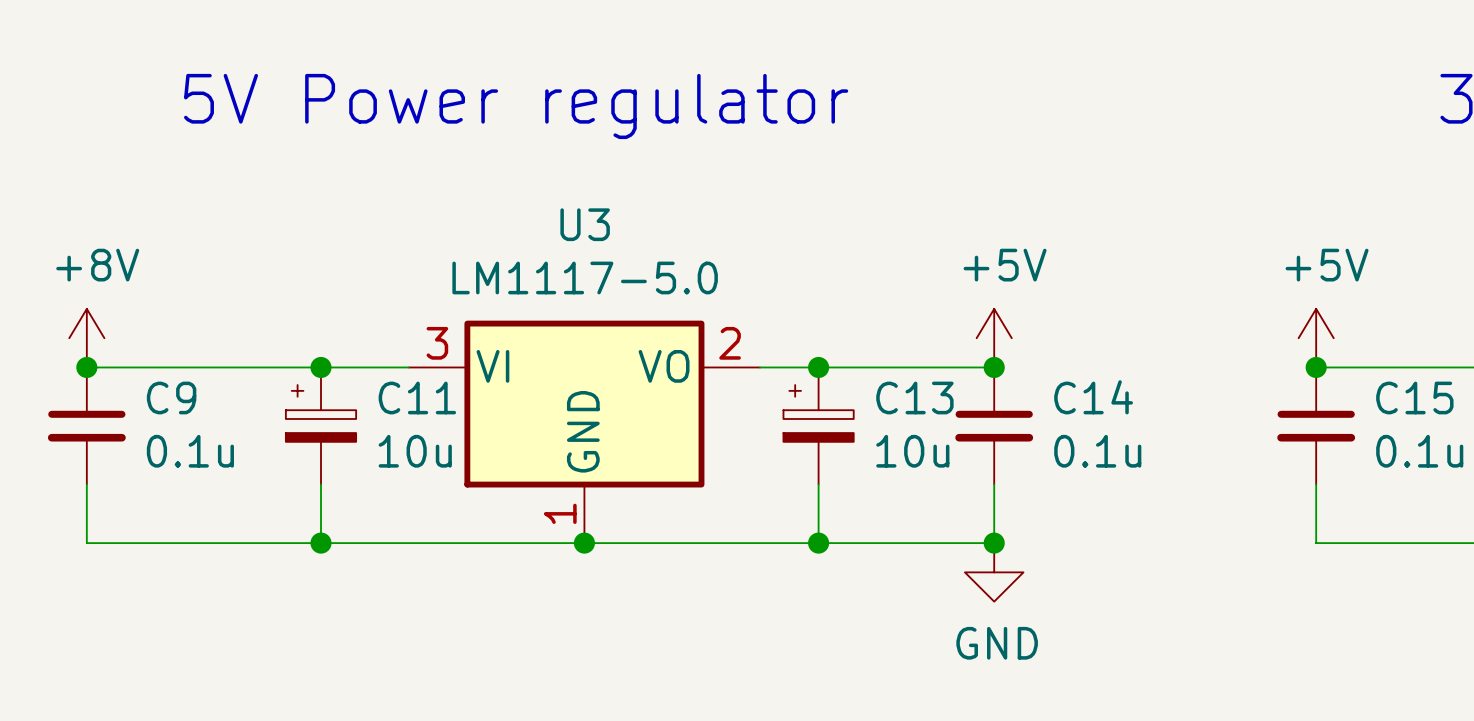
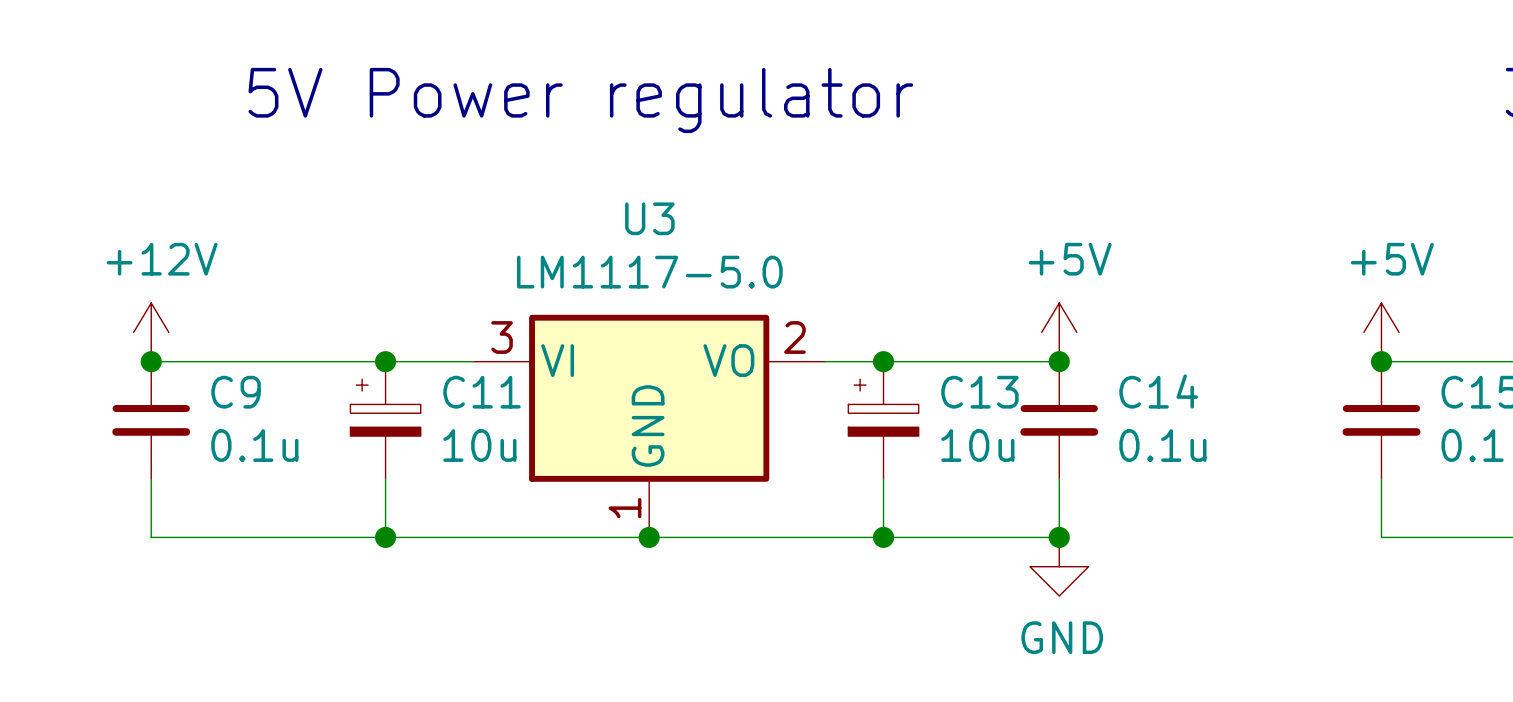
power symbol: +8V (86, 338) -> +12V (151, 332)

